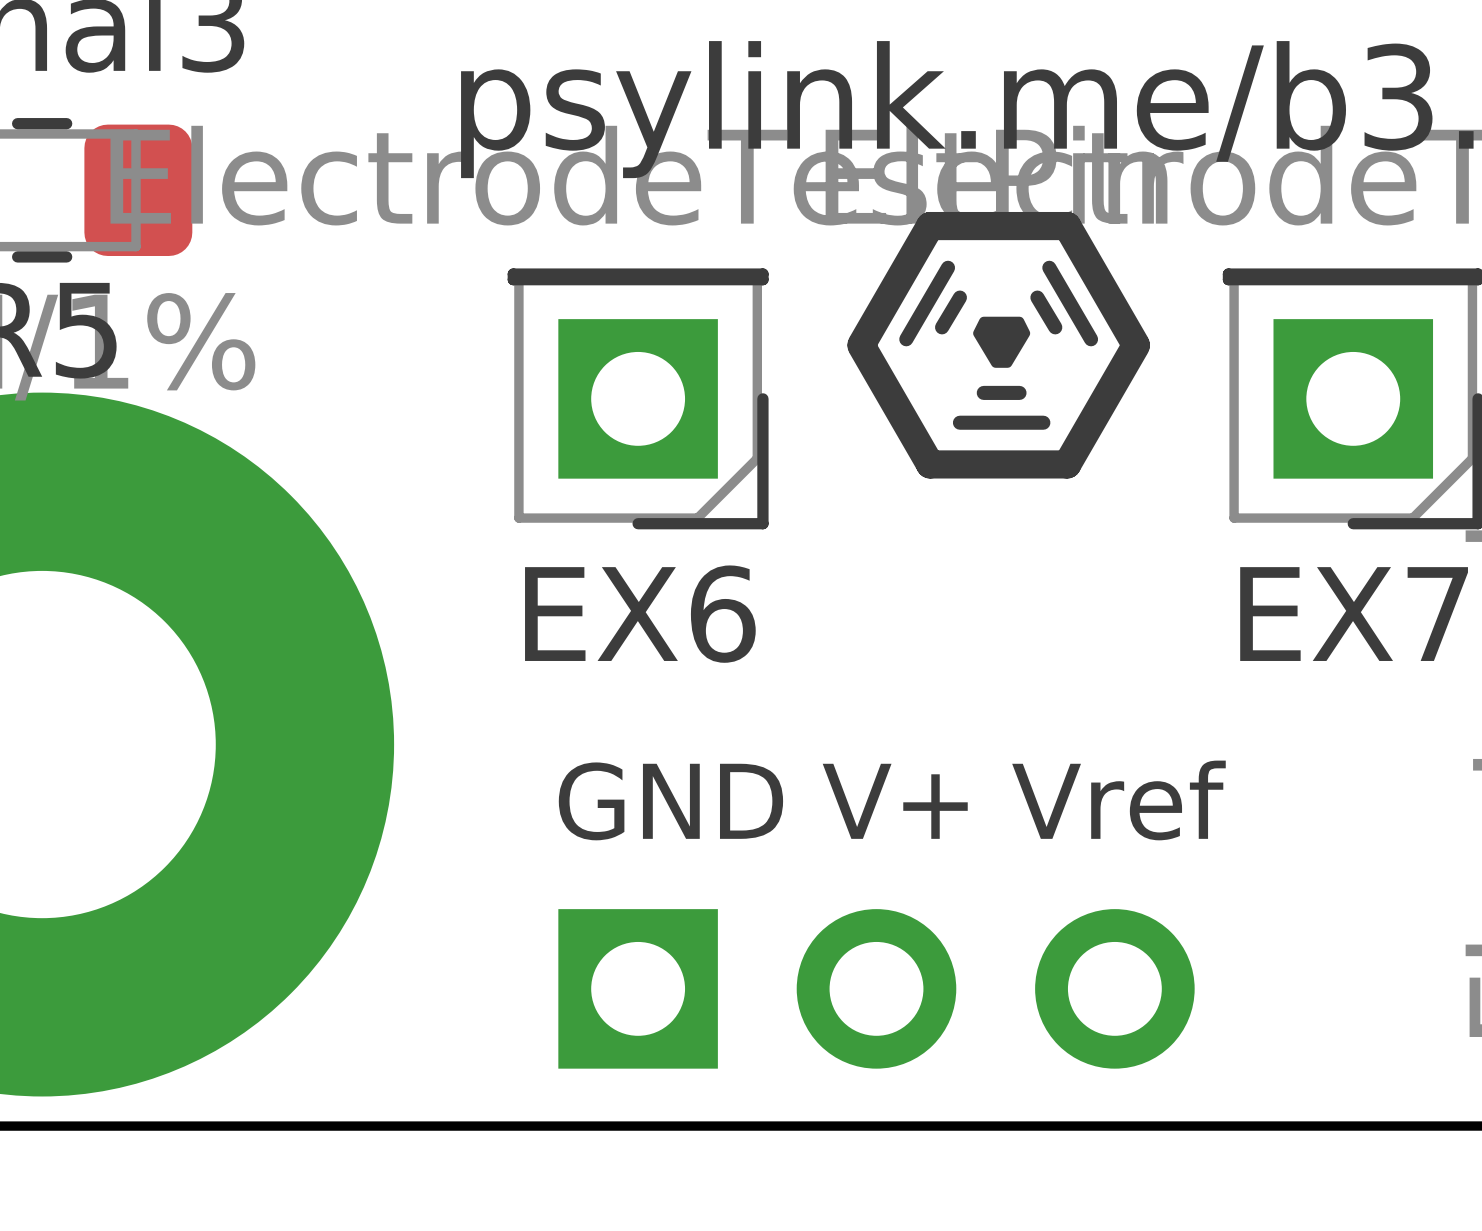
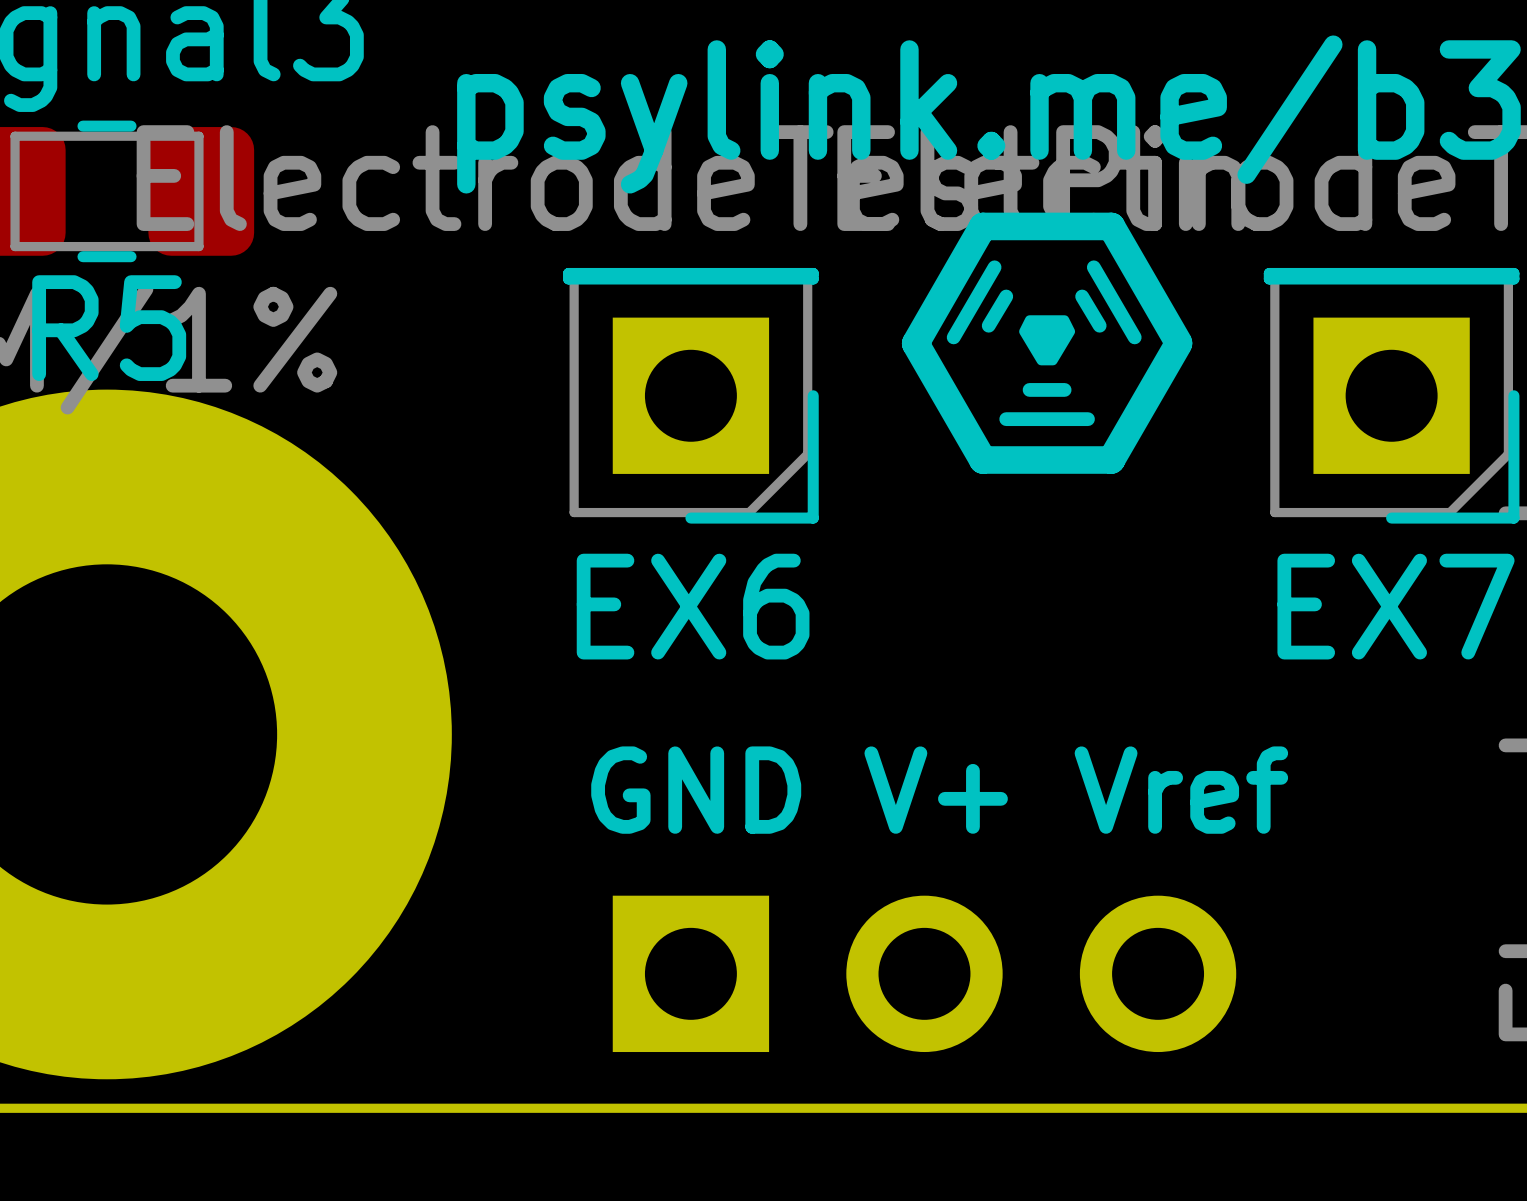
line: (936, 226) (930, 226) (861, 344) -> none
line: (861, 345) (930, 464) (936, 464) -> (982, 226) (915, 343) (982, 460)

